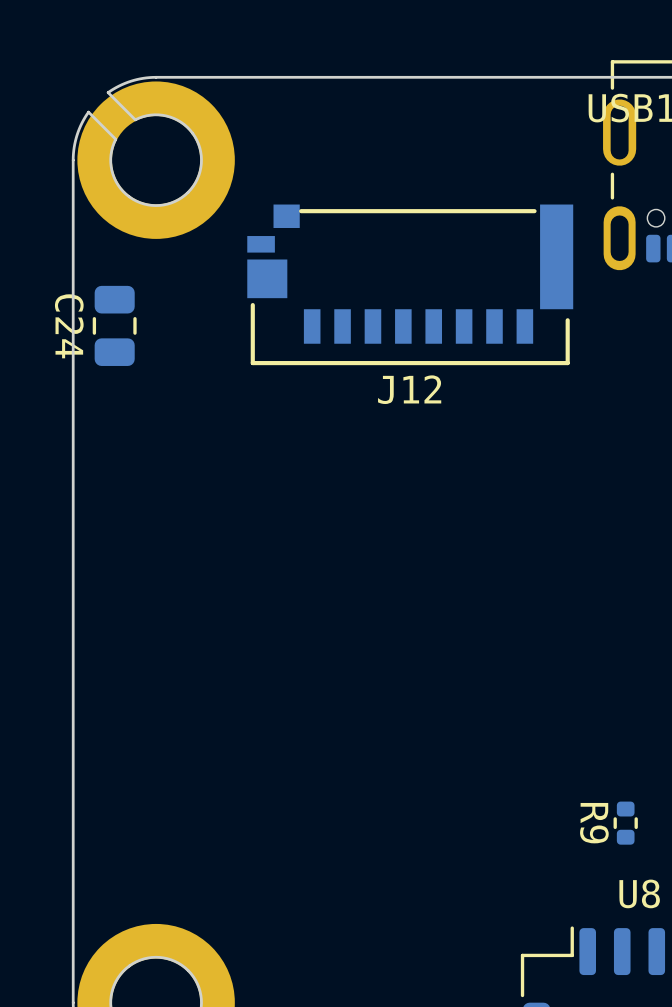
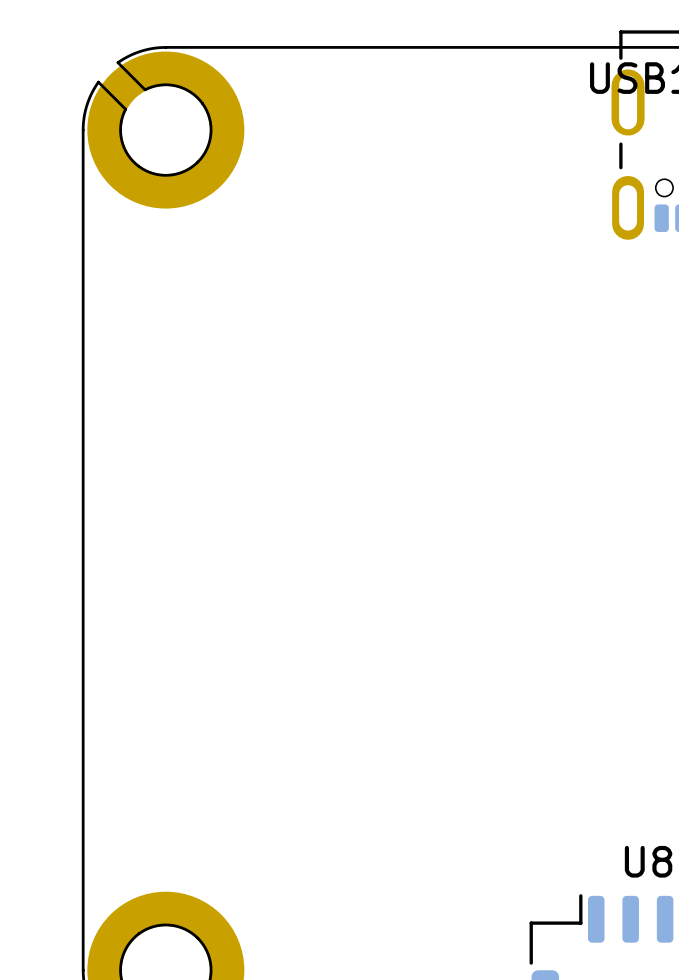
J12: (410, 284) -> none
C24: (114, 325) -> none
R9: (625, 823) -> none

